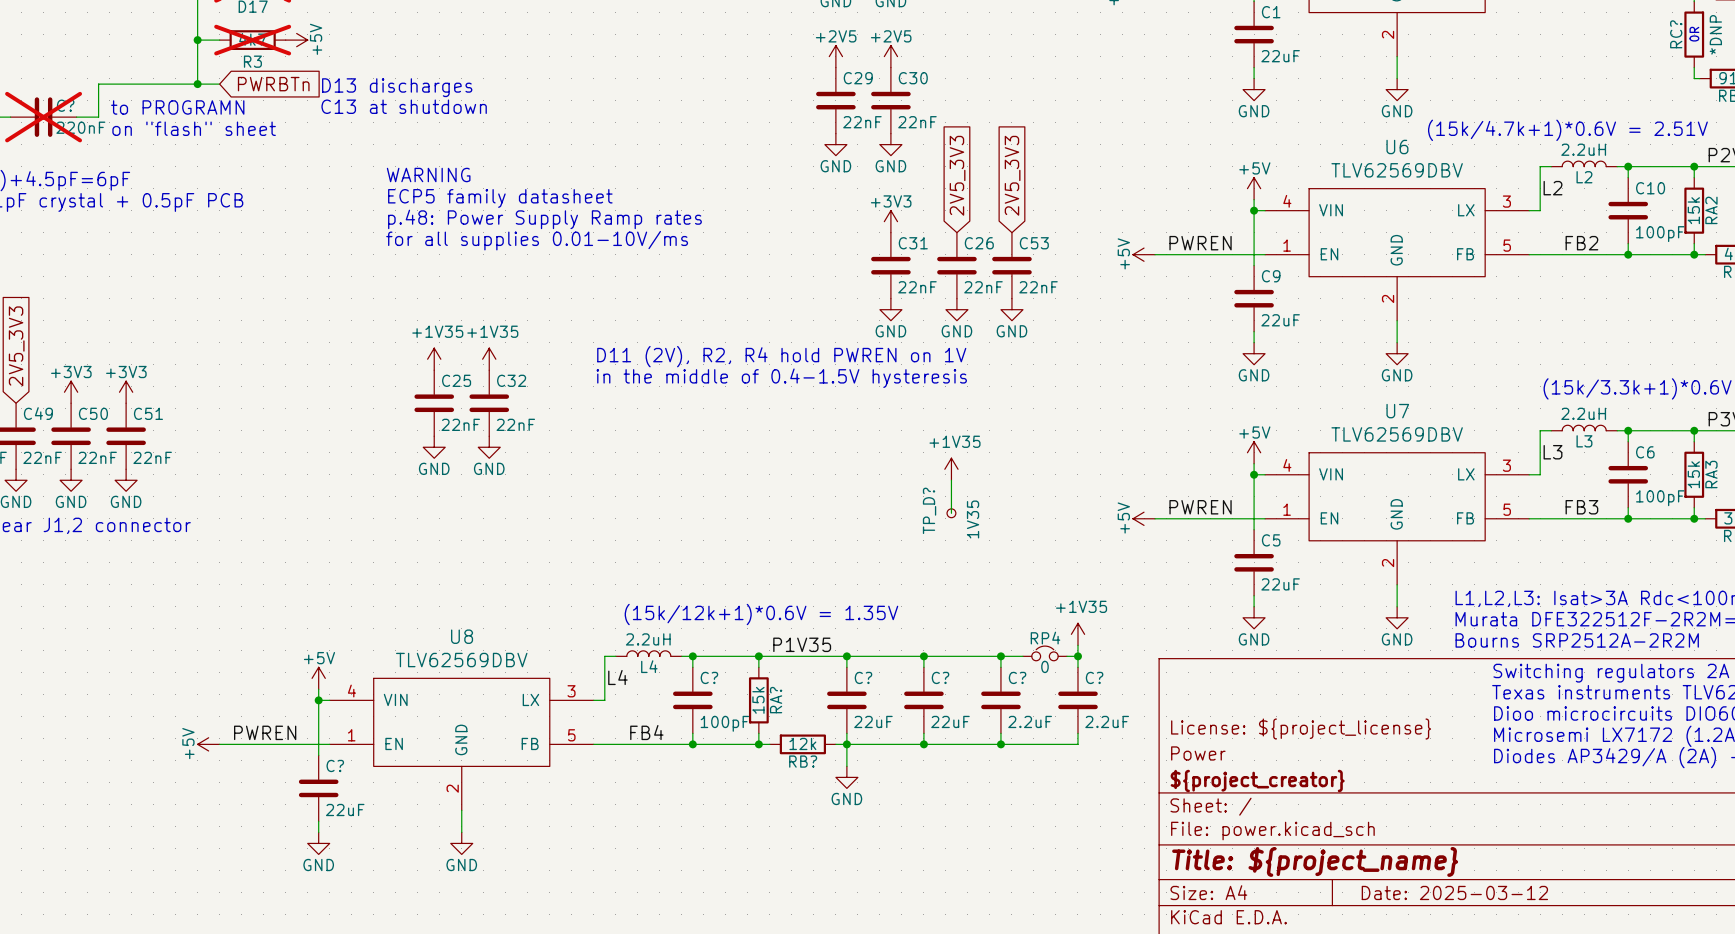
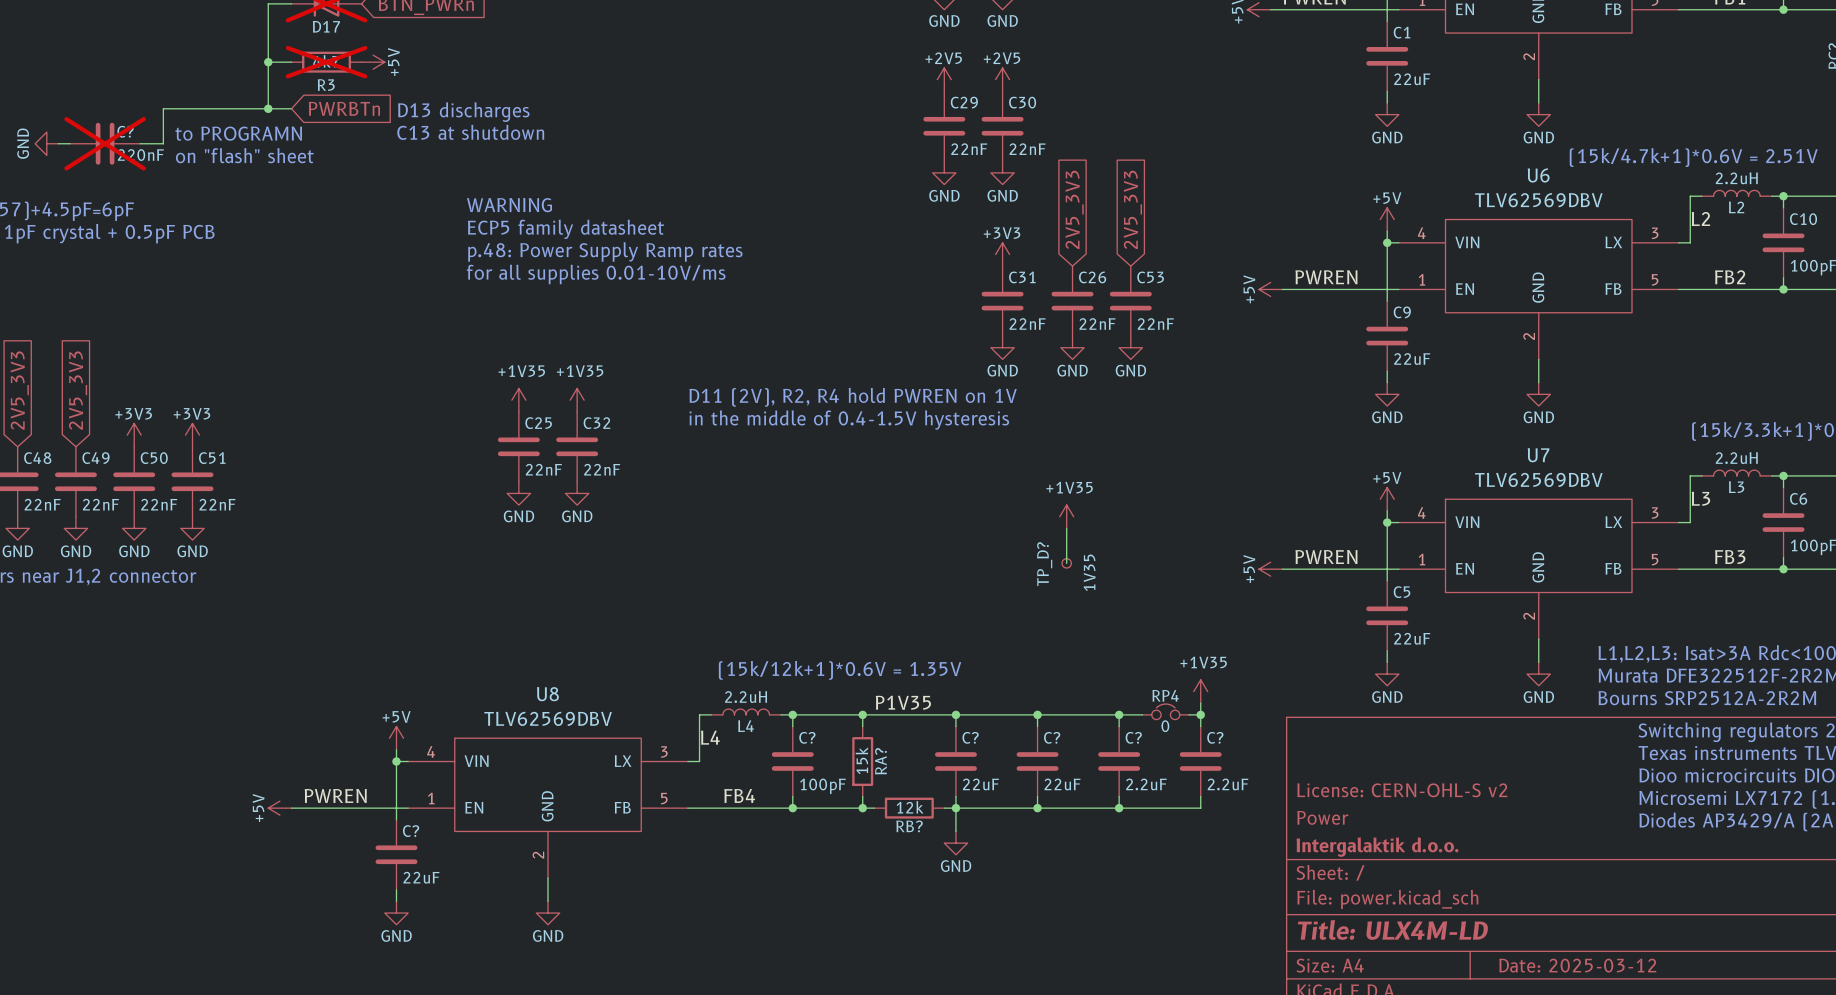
title block: License: ${project_license} (1301, 729) -> License: CERN-OHL-S v2 (1402, 790)
title block: ${project_creator} (1257, 781) -> Intergalaktik d.o.o. (1377, 847)
title block: Title: ${project_name} (1315, 861) -> Title: ULX4M-LD (1393, 929)

